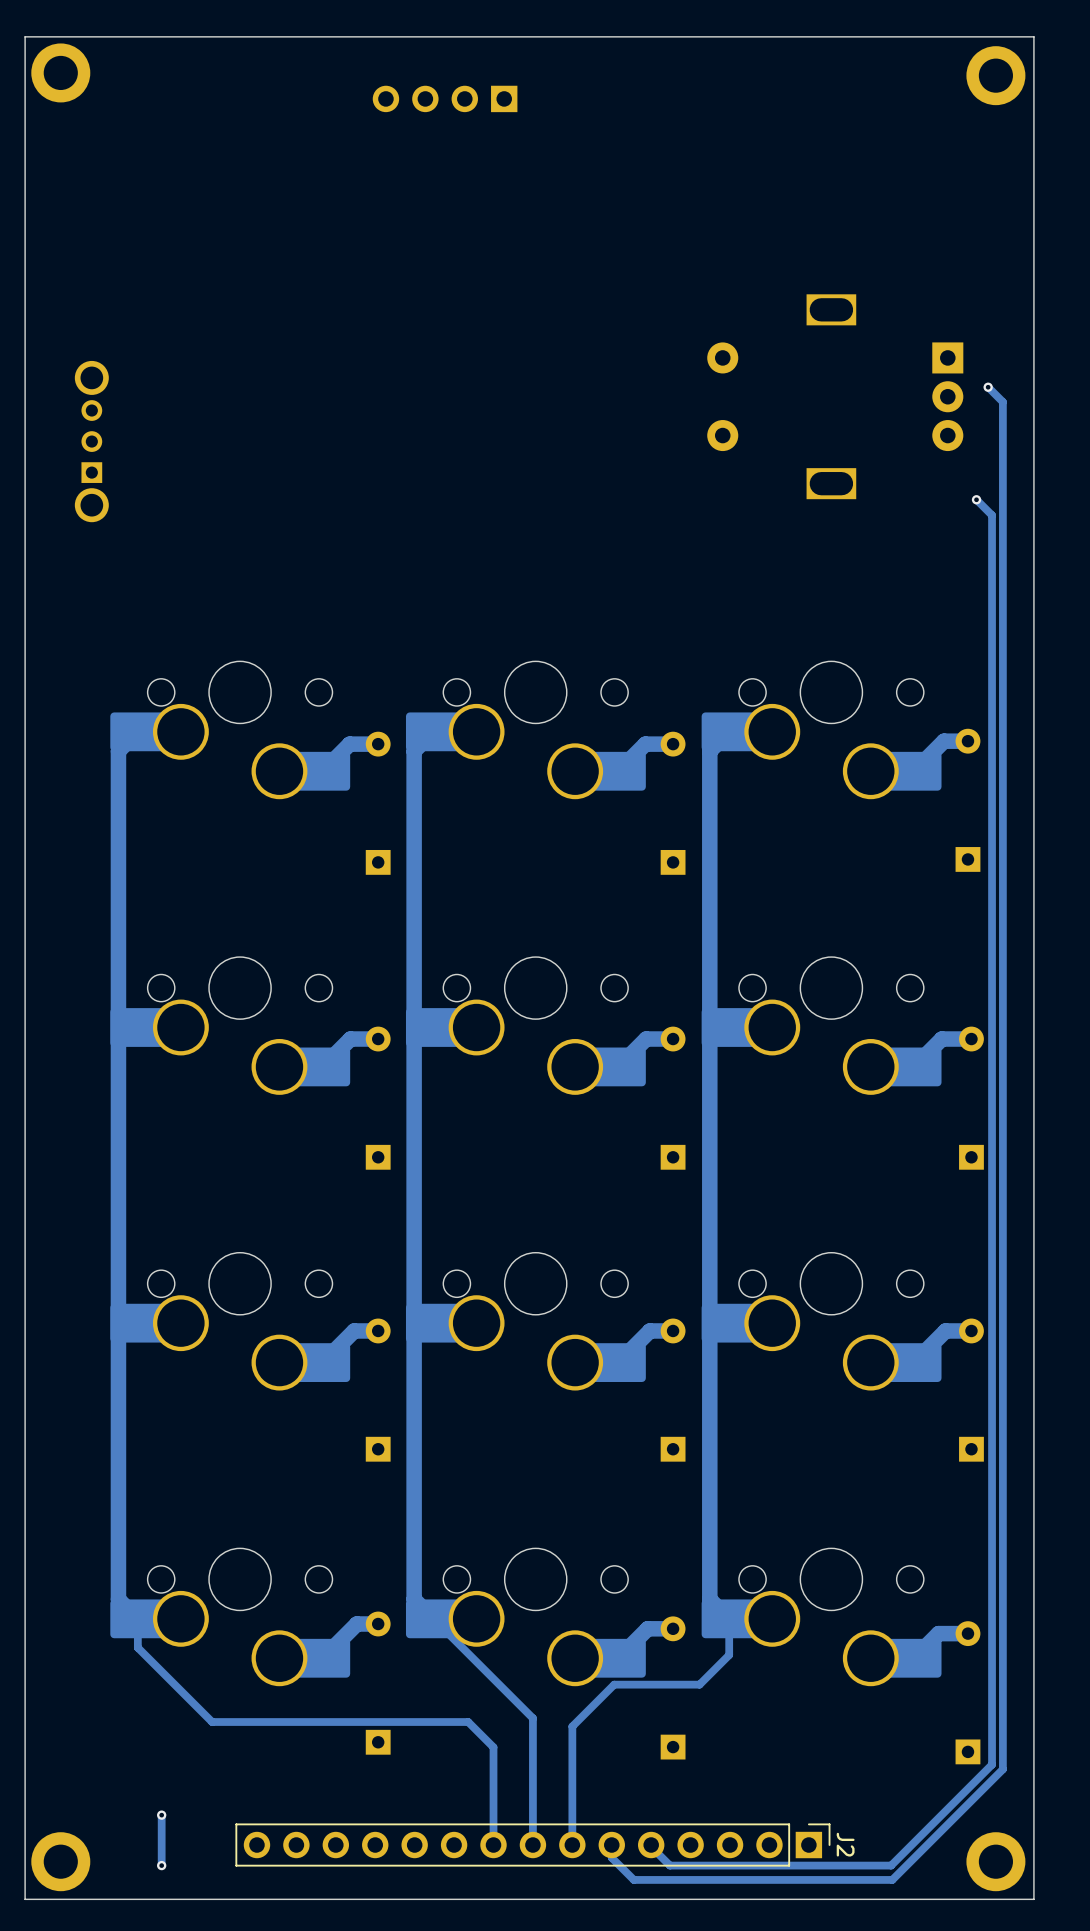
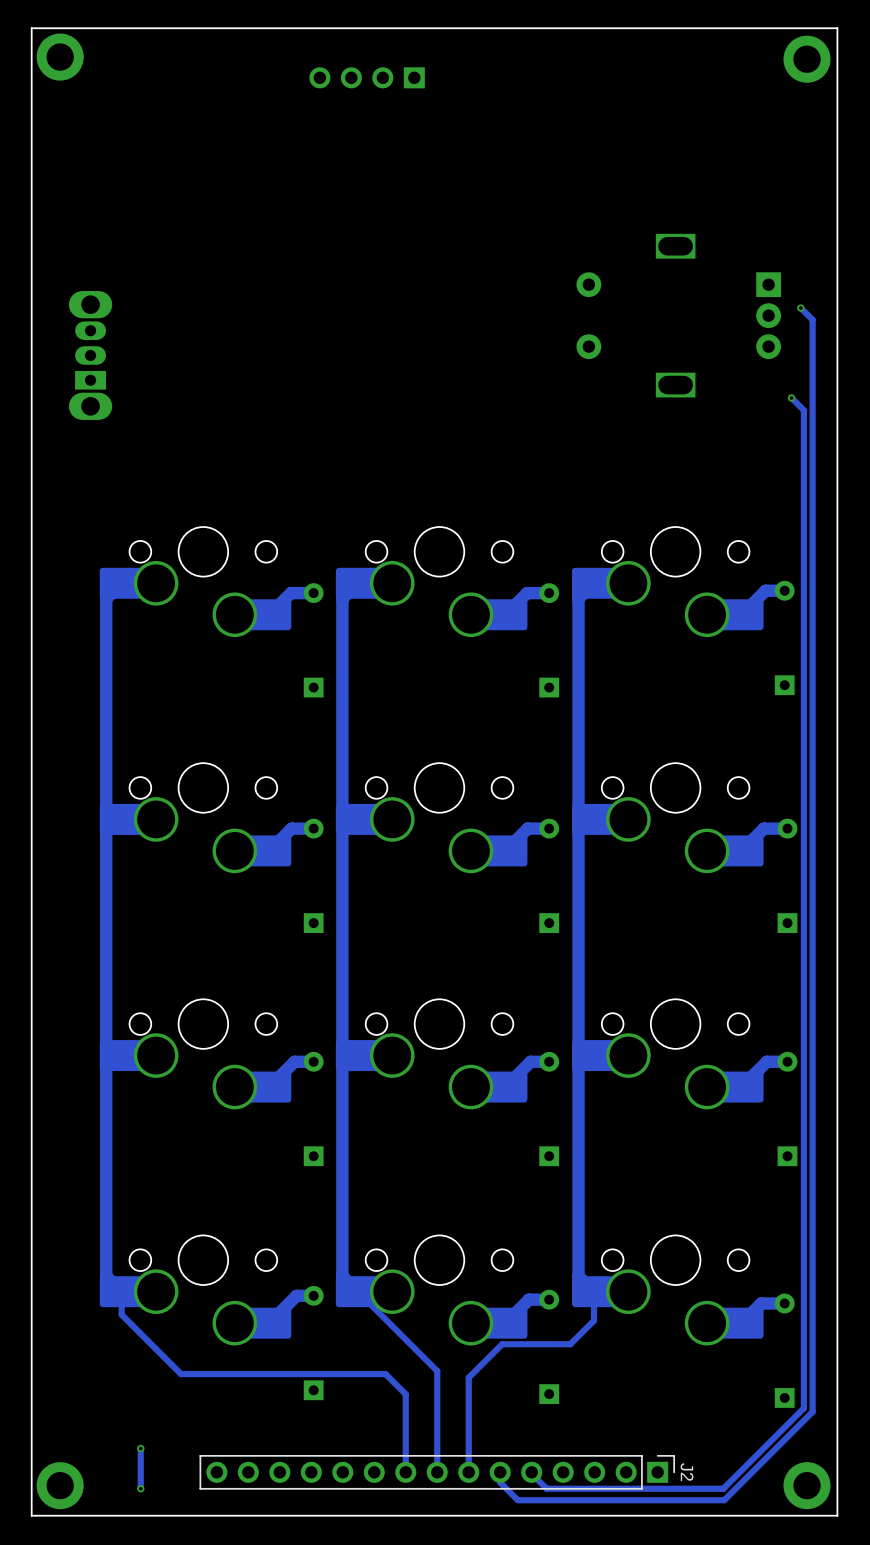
part footprint: [74, 360, 109, 523] -> [68, 291, 113, 420]

